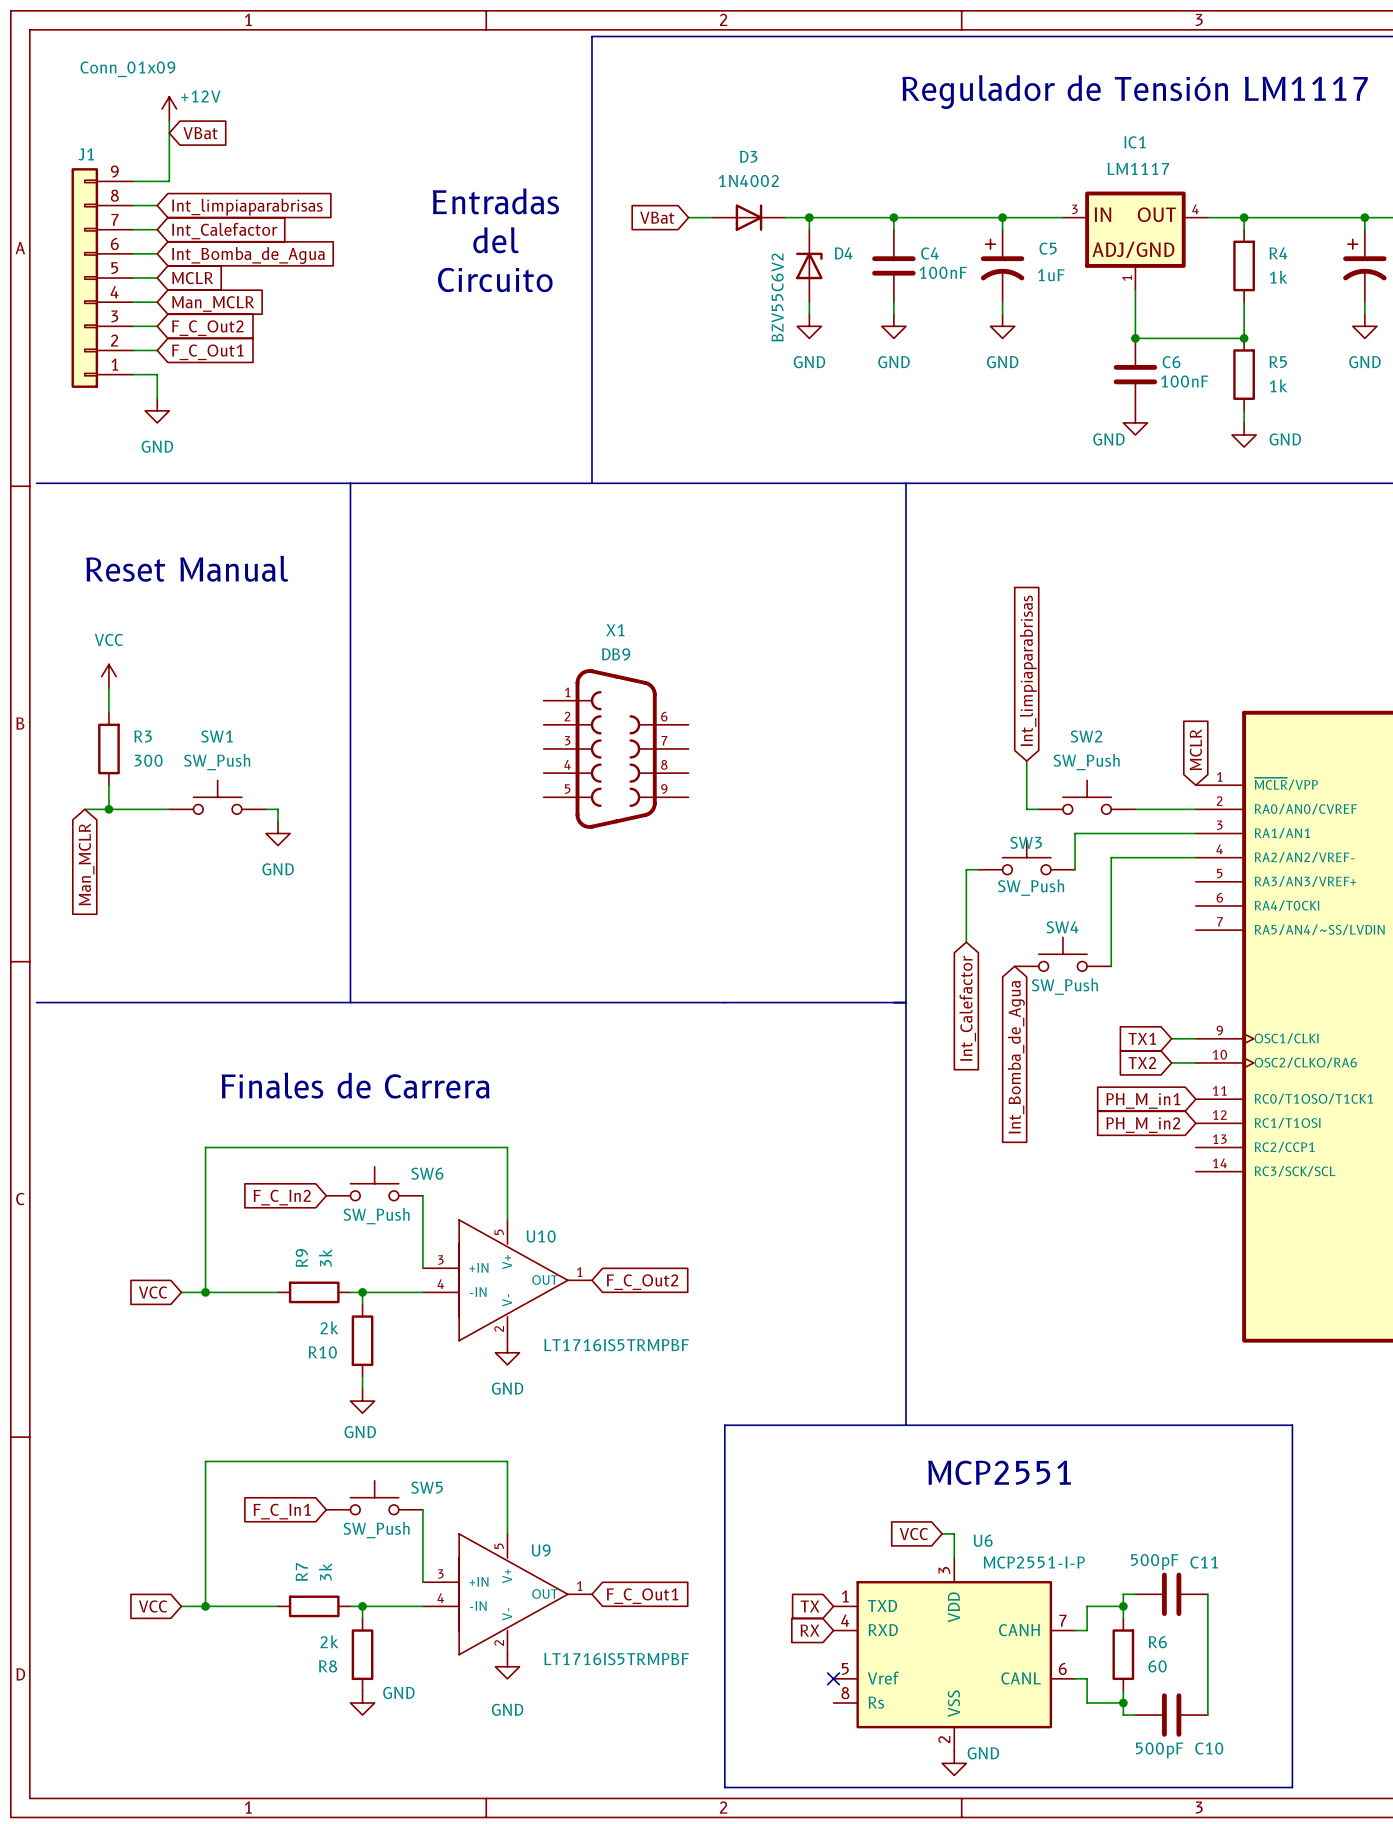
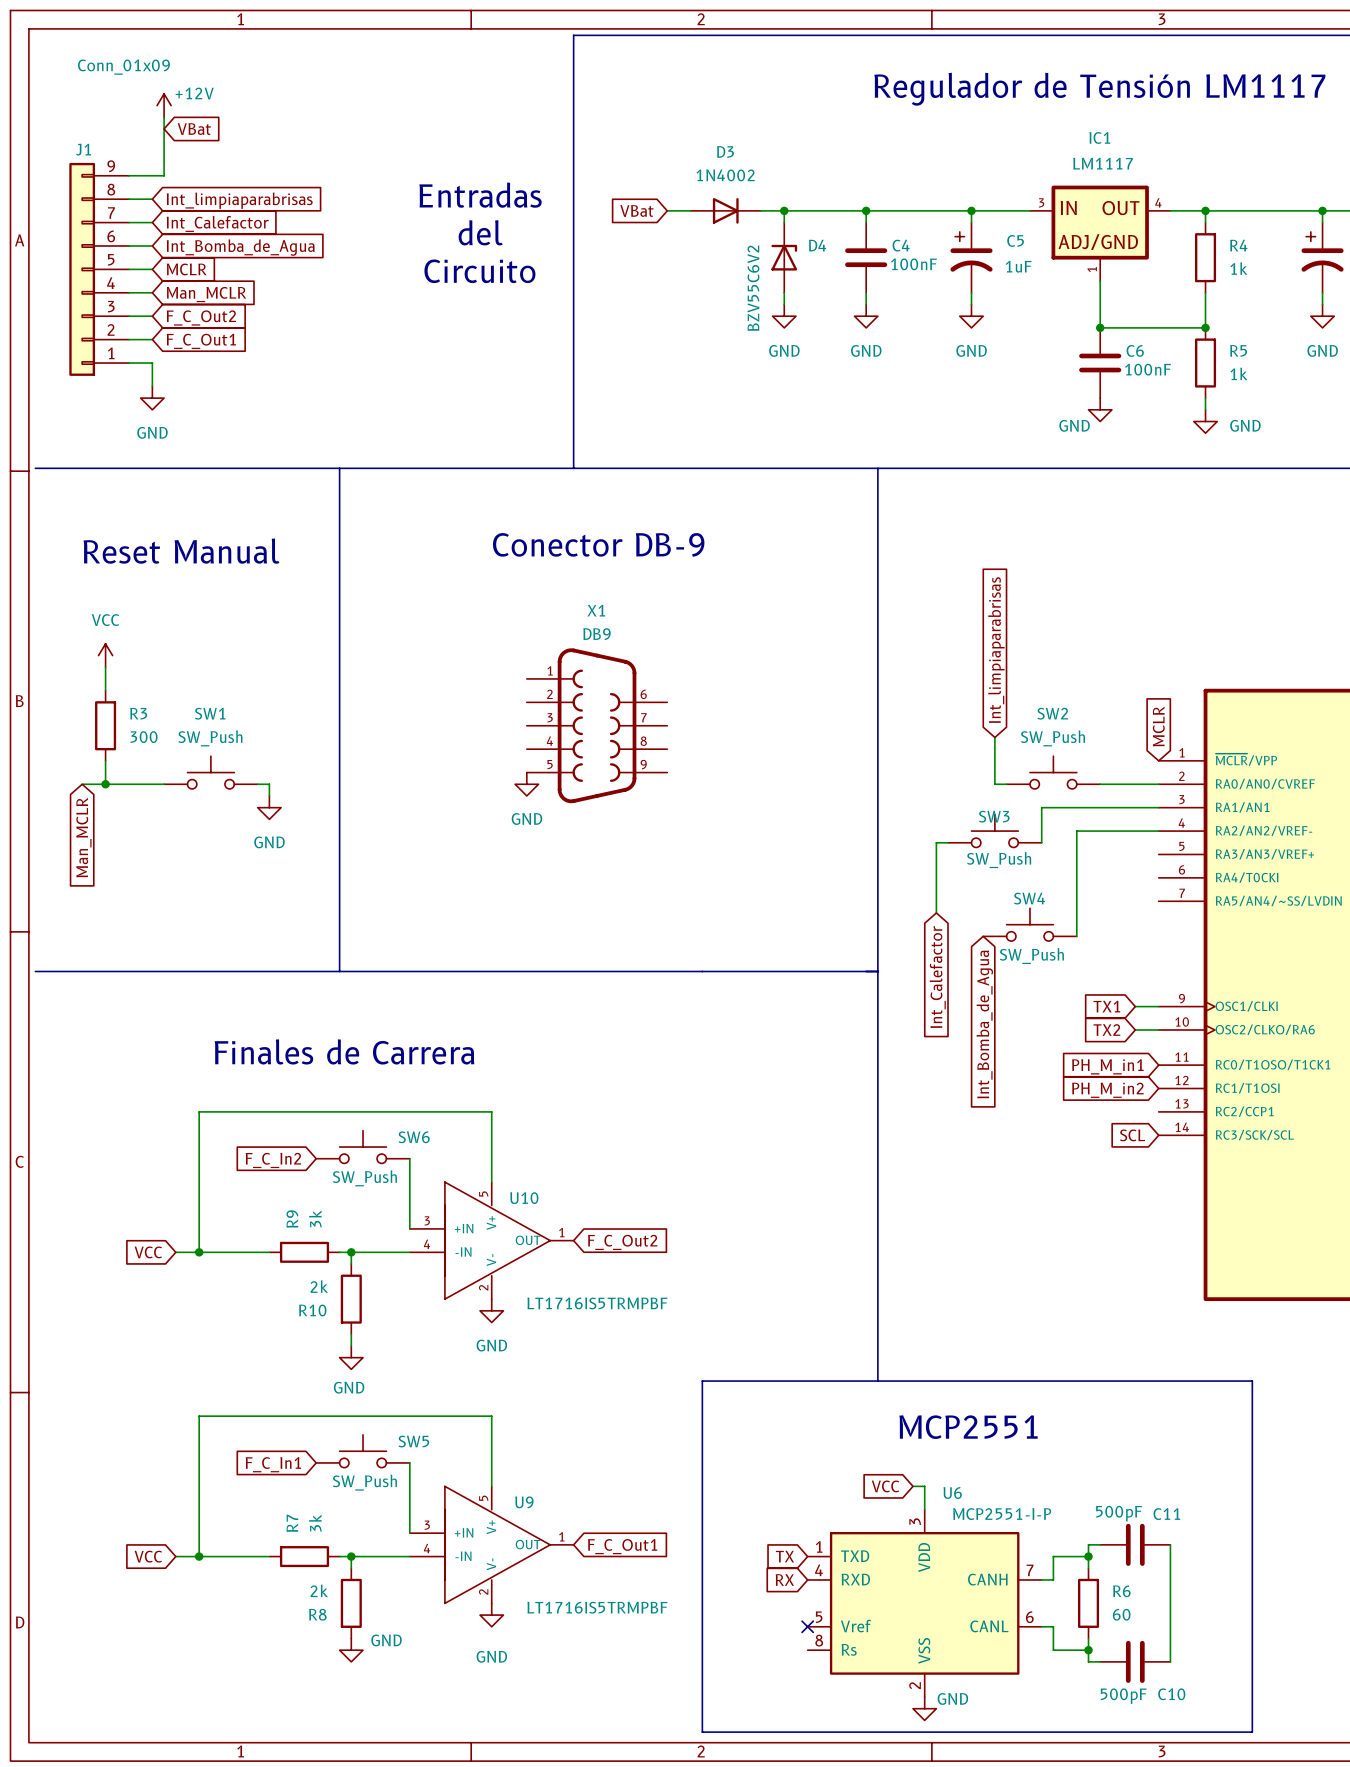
text: none -> Conector DB-9 (598, 544)
power symbol: none -> GND (526, 784)
global label: none -> SCL (1132, 1135)

